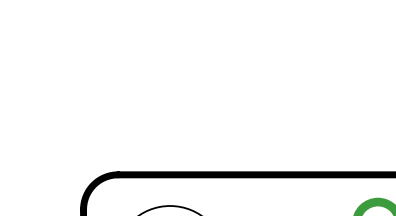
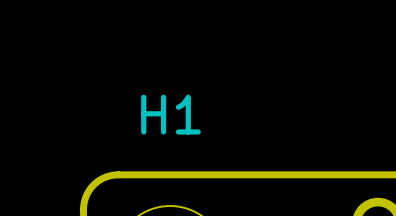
H1 name: none -> H1 (170, 114)

